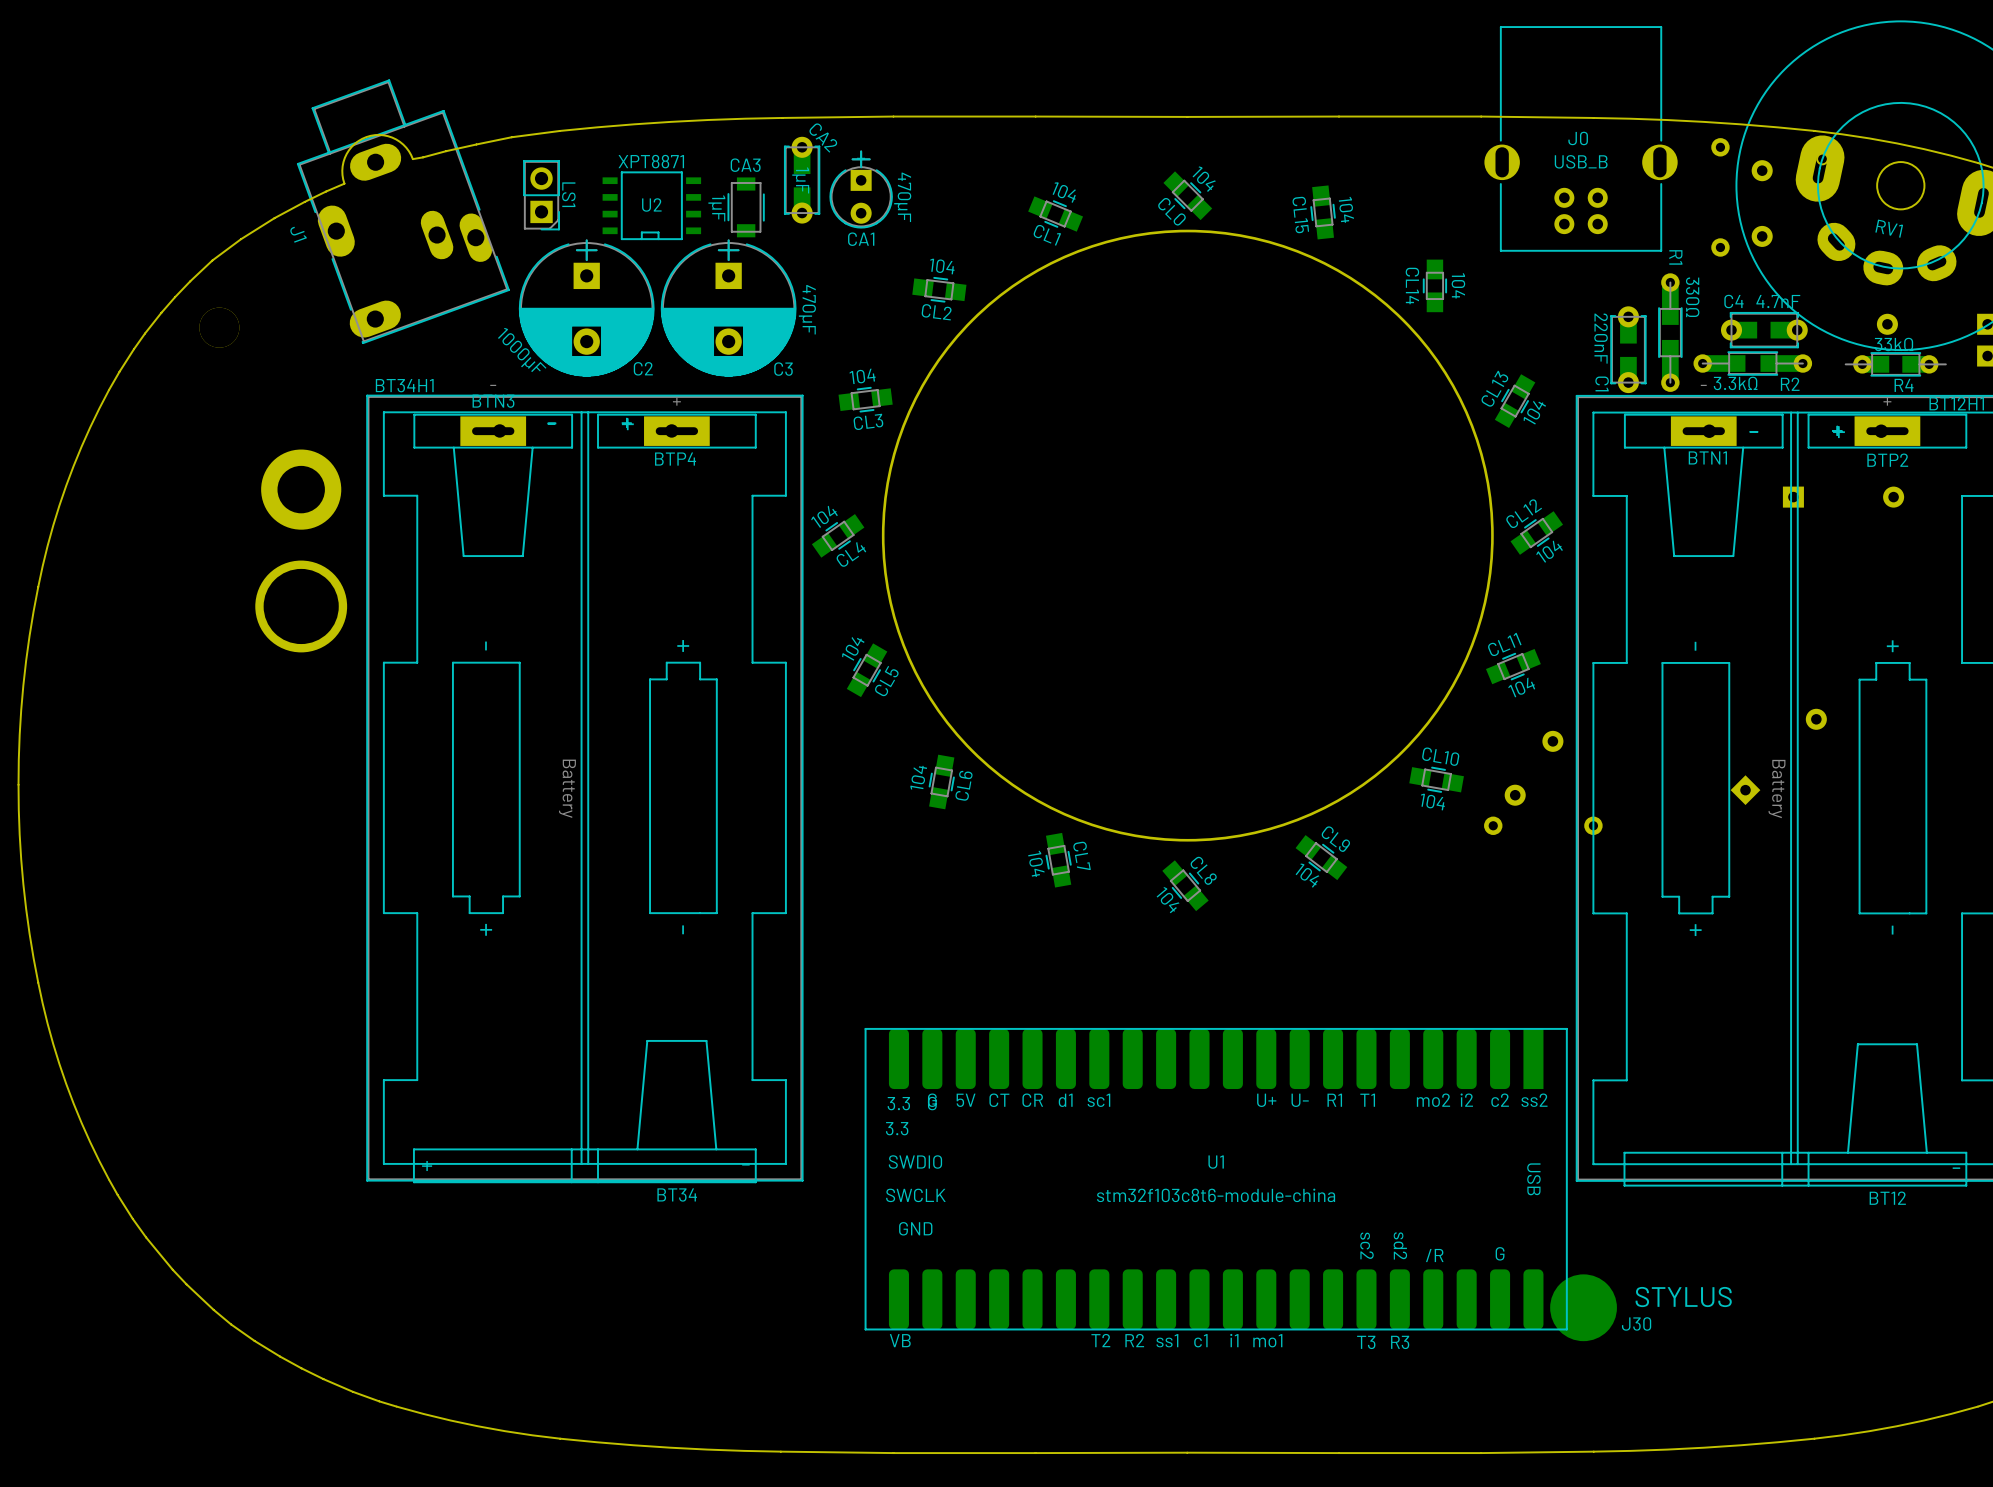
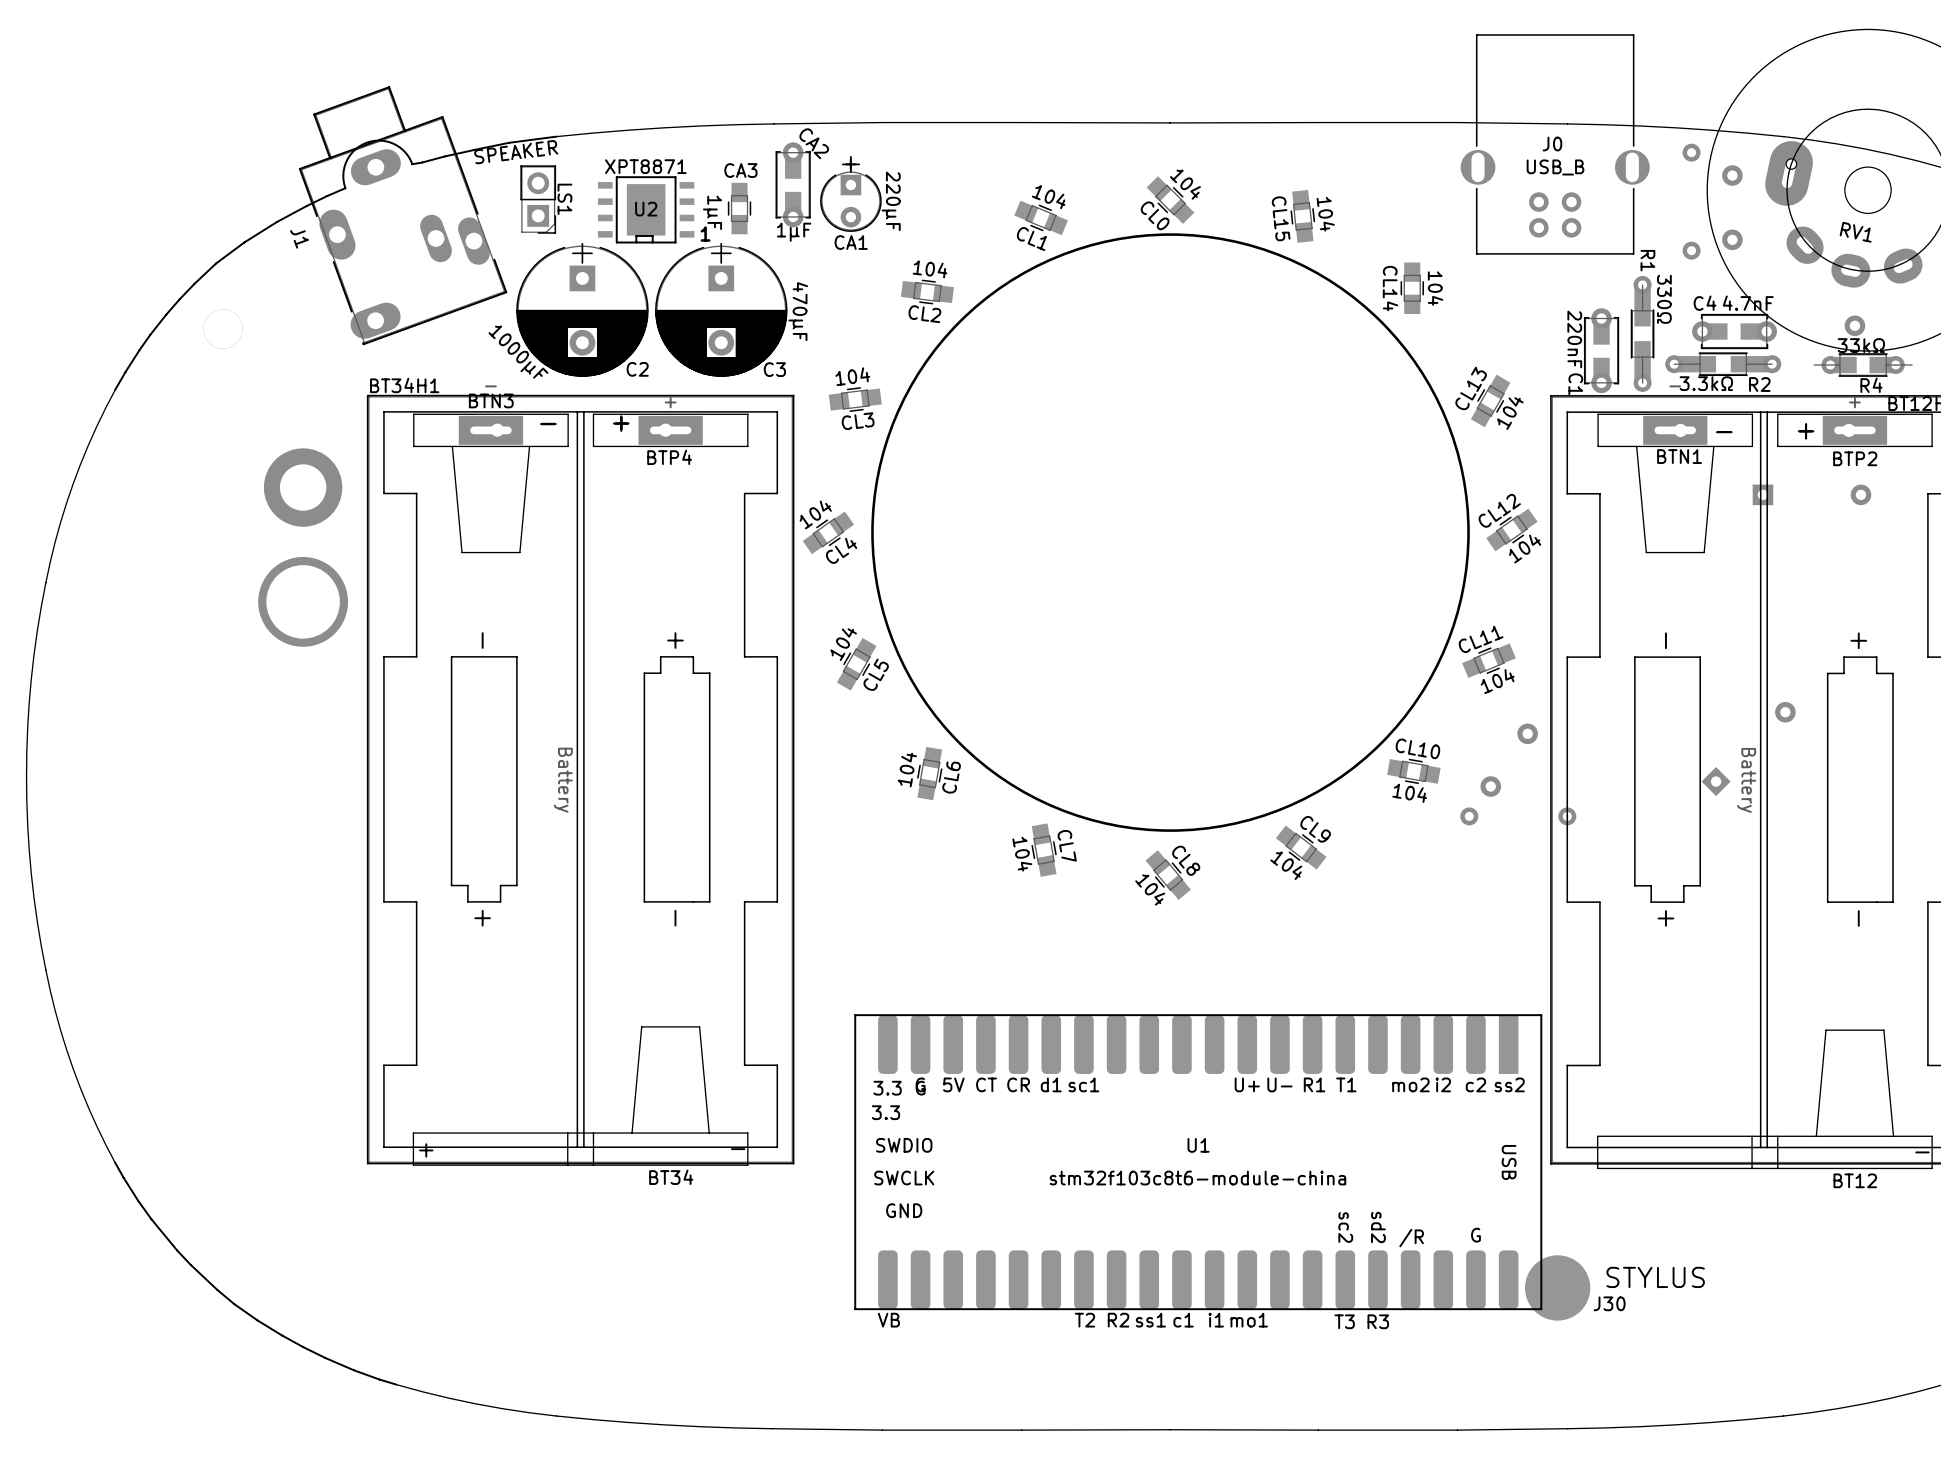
LS1 value: none -> SPEAKER (516, 152)
U2 footprint: [602, 171, 702, 241] -> [597, 176, 695, 244]
CA3 footprint: [727, 177, 765, 238] -> [727, 182, 752, 235]
CA2 value rotation: 0° (800, 180) -> 90° counterclockwise (794, 232)
CA1 value: 470μF (902, 197) -> 220μF (891, 201)
text: none -> 1 (705, 234)

